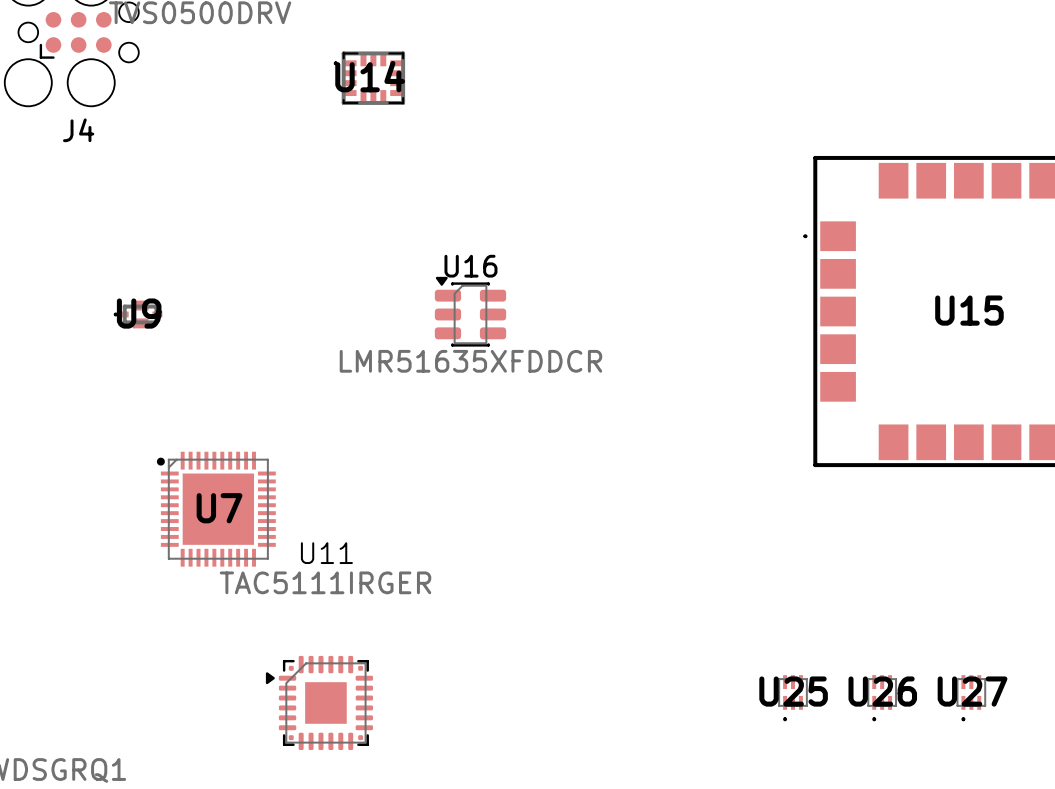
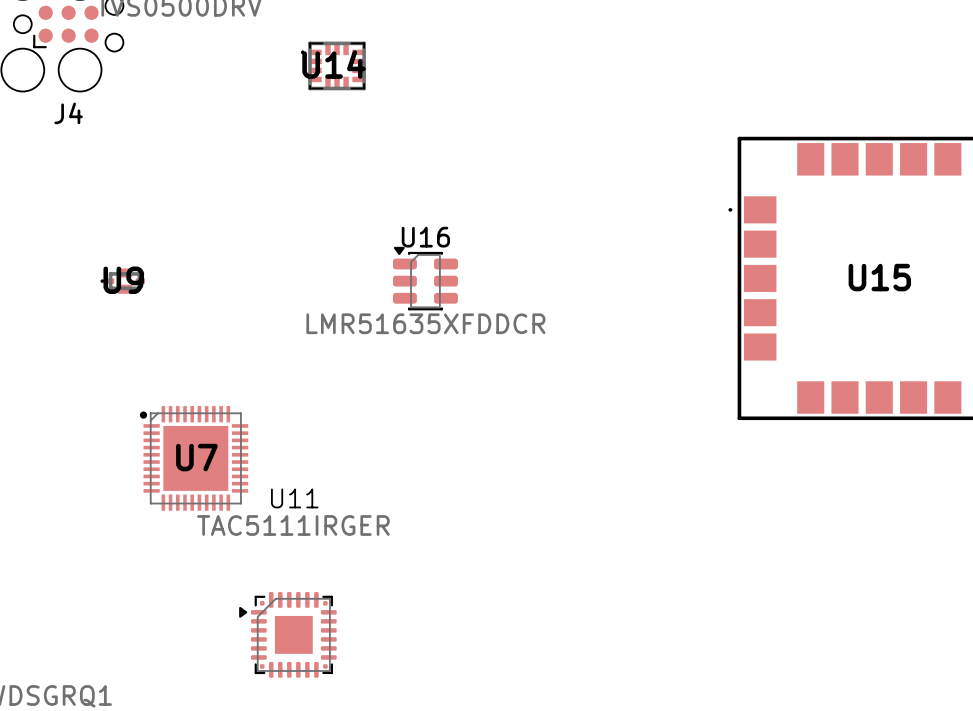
U25: (792, 698) -> none
U26: (882, 698) -> none
U27: (971, 698) -> none

